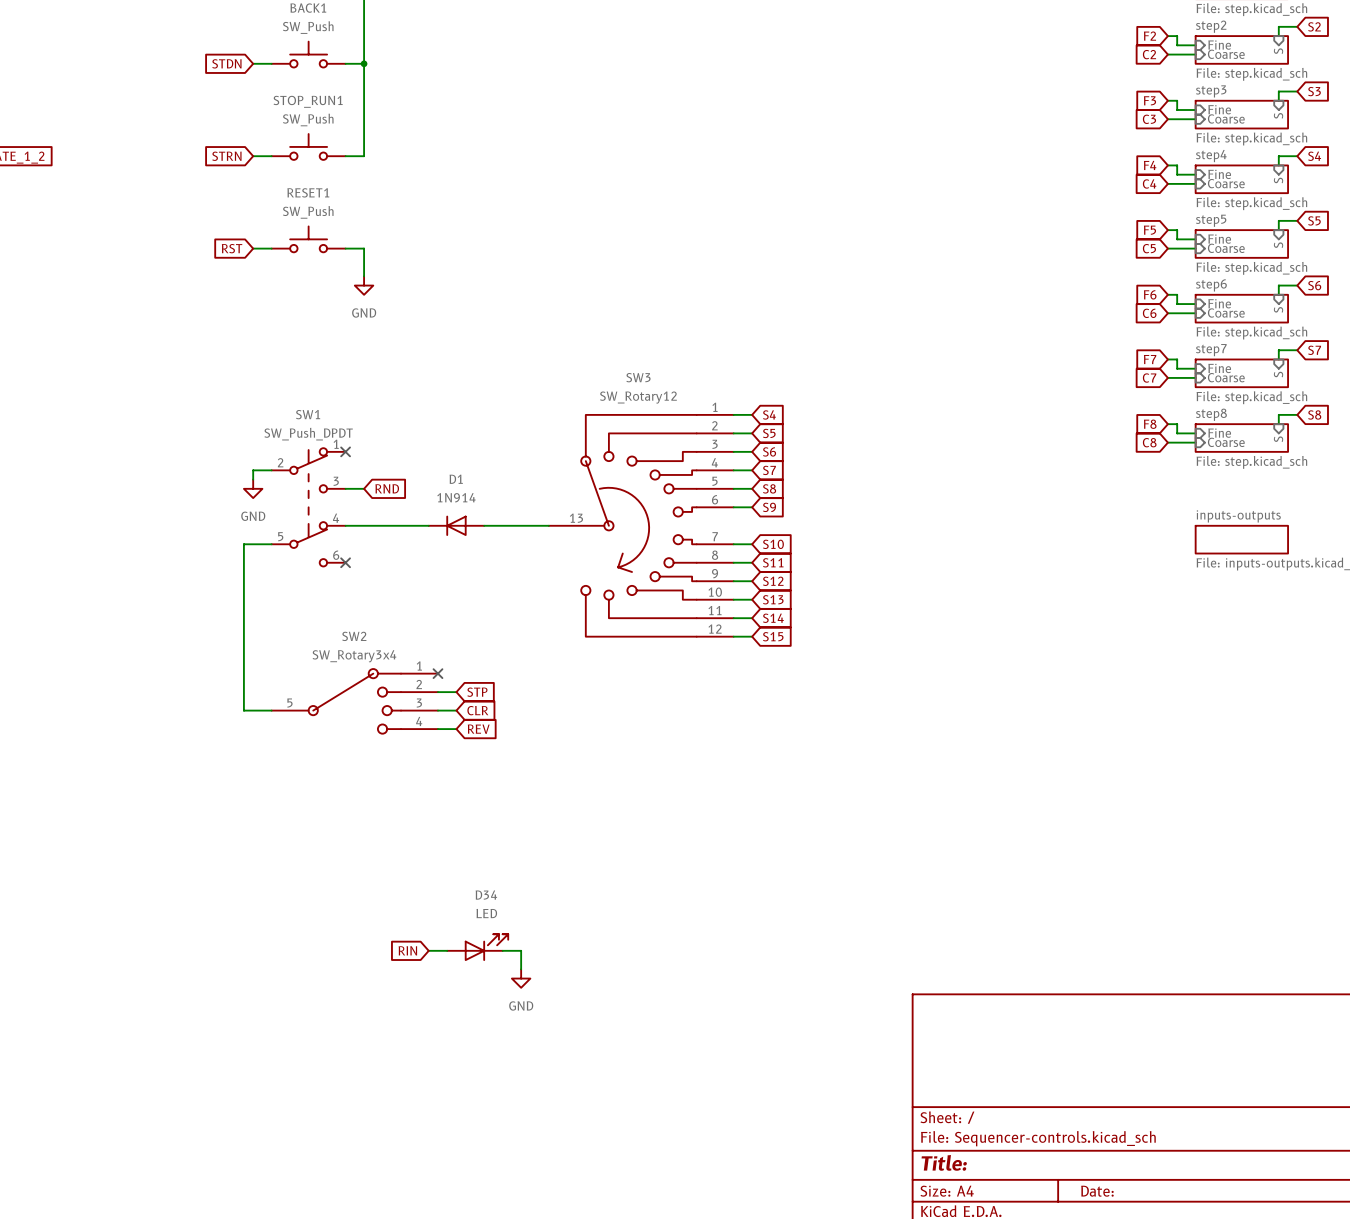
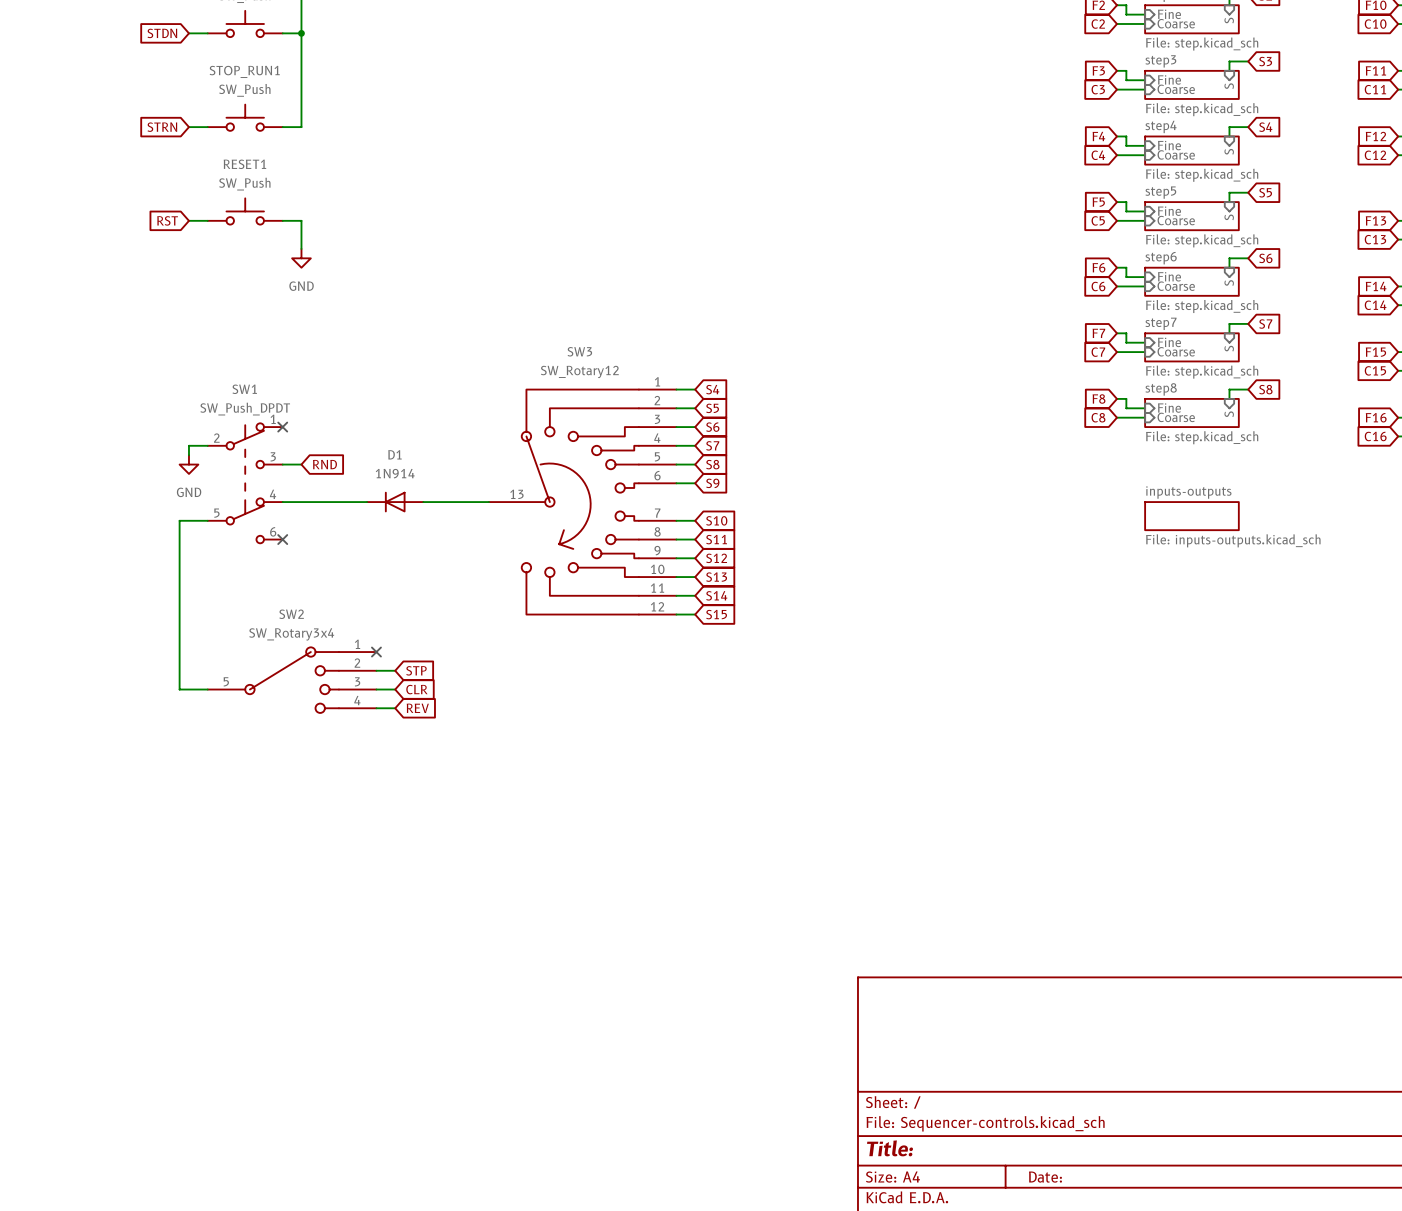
D34: LED (477, 947) -> none
global label: RIN (407, 950) -> none
wire: (428, 950) (447, 950) -> none
wire: (502, 950) (521, 950) (521, 969) -> none
power symbol: GND (521, 978) -> none

